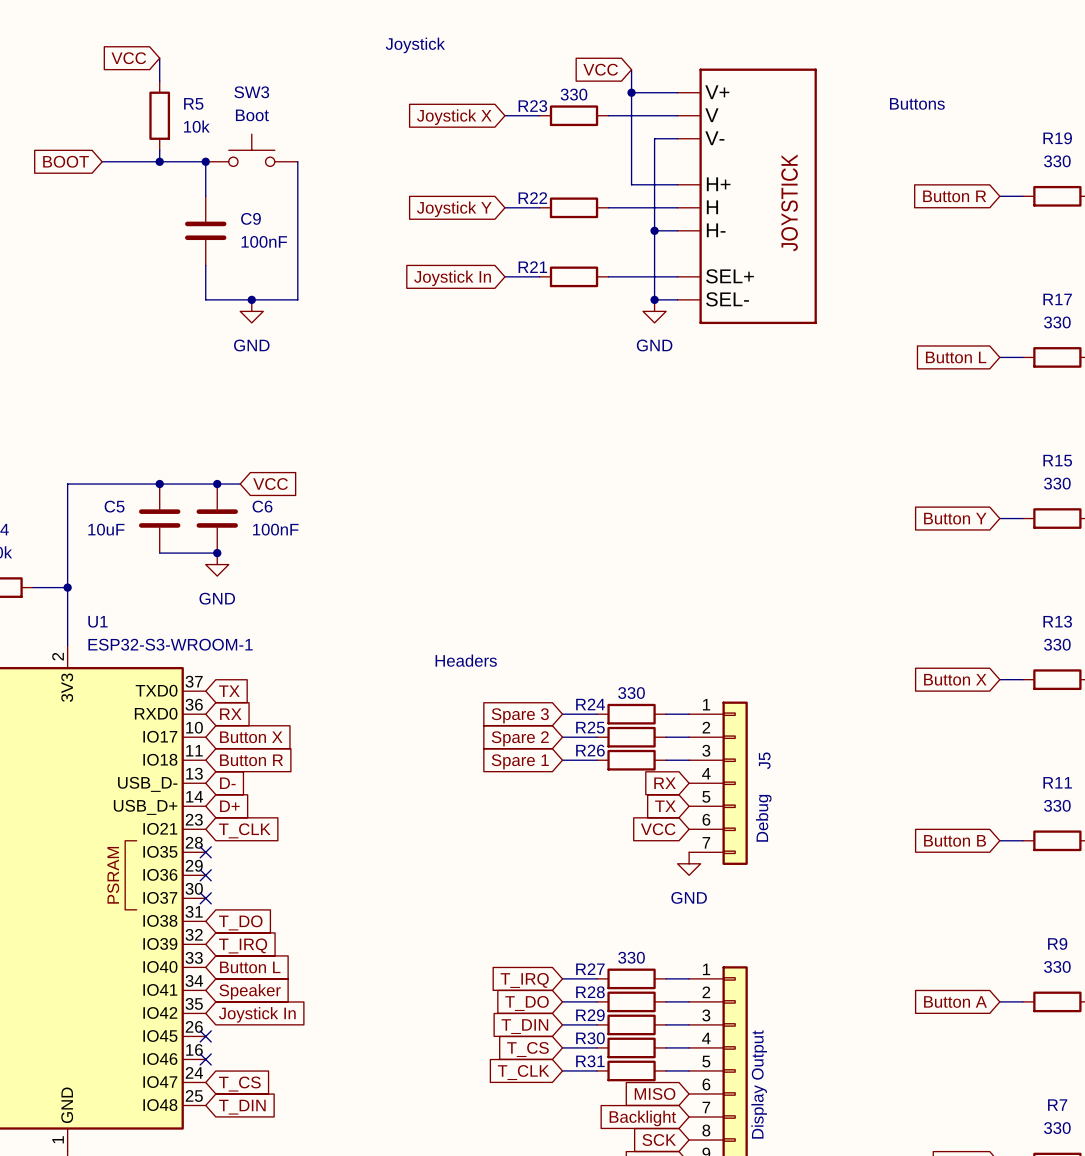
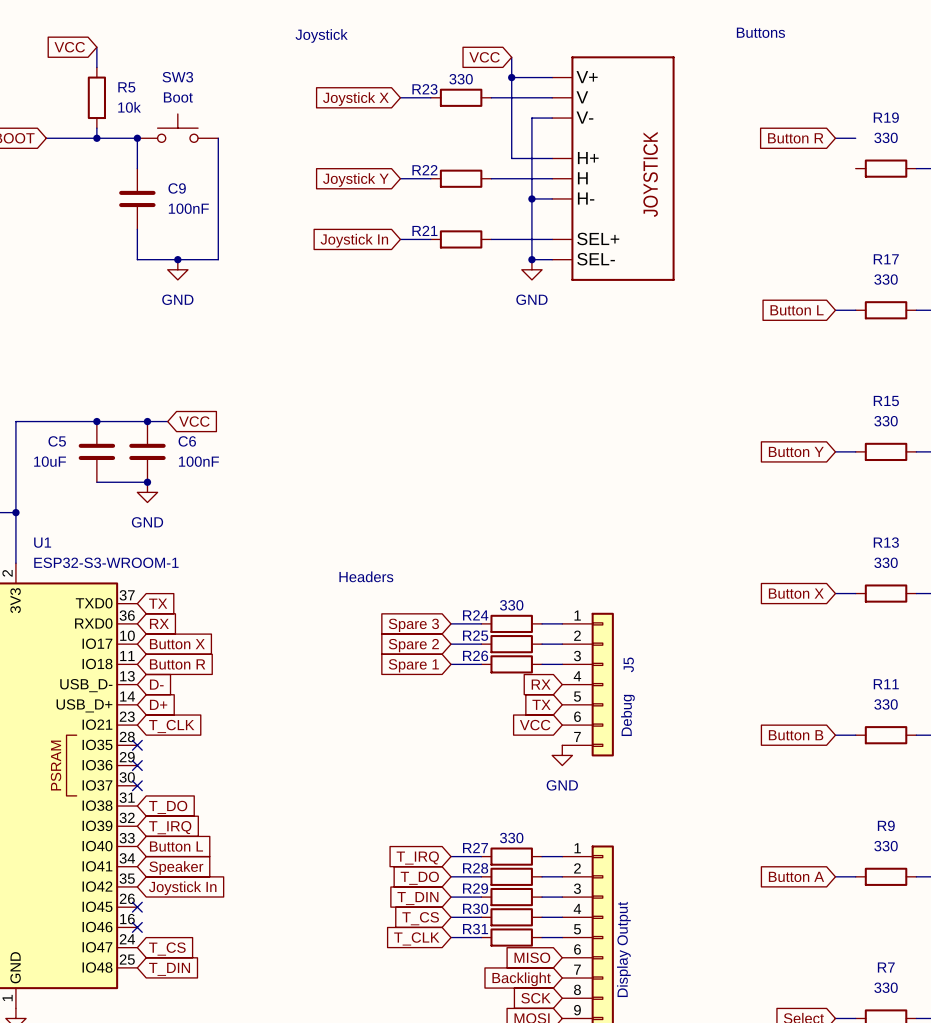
text position: Buttons (917, 103) -> Buttons (760, 32)
global label position: Button R (954, 196) -> Button R (795, 138)
wire: (999, 196) (1022, 196) -> (835, 138) (855, 138)

